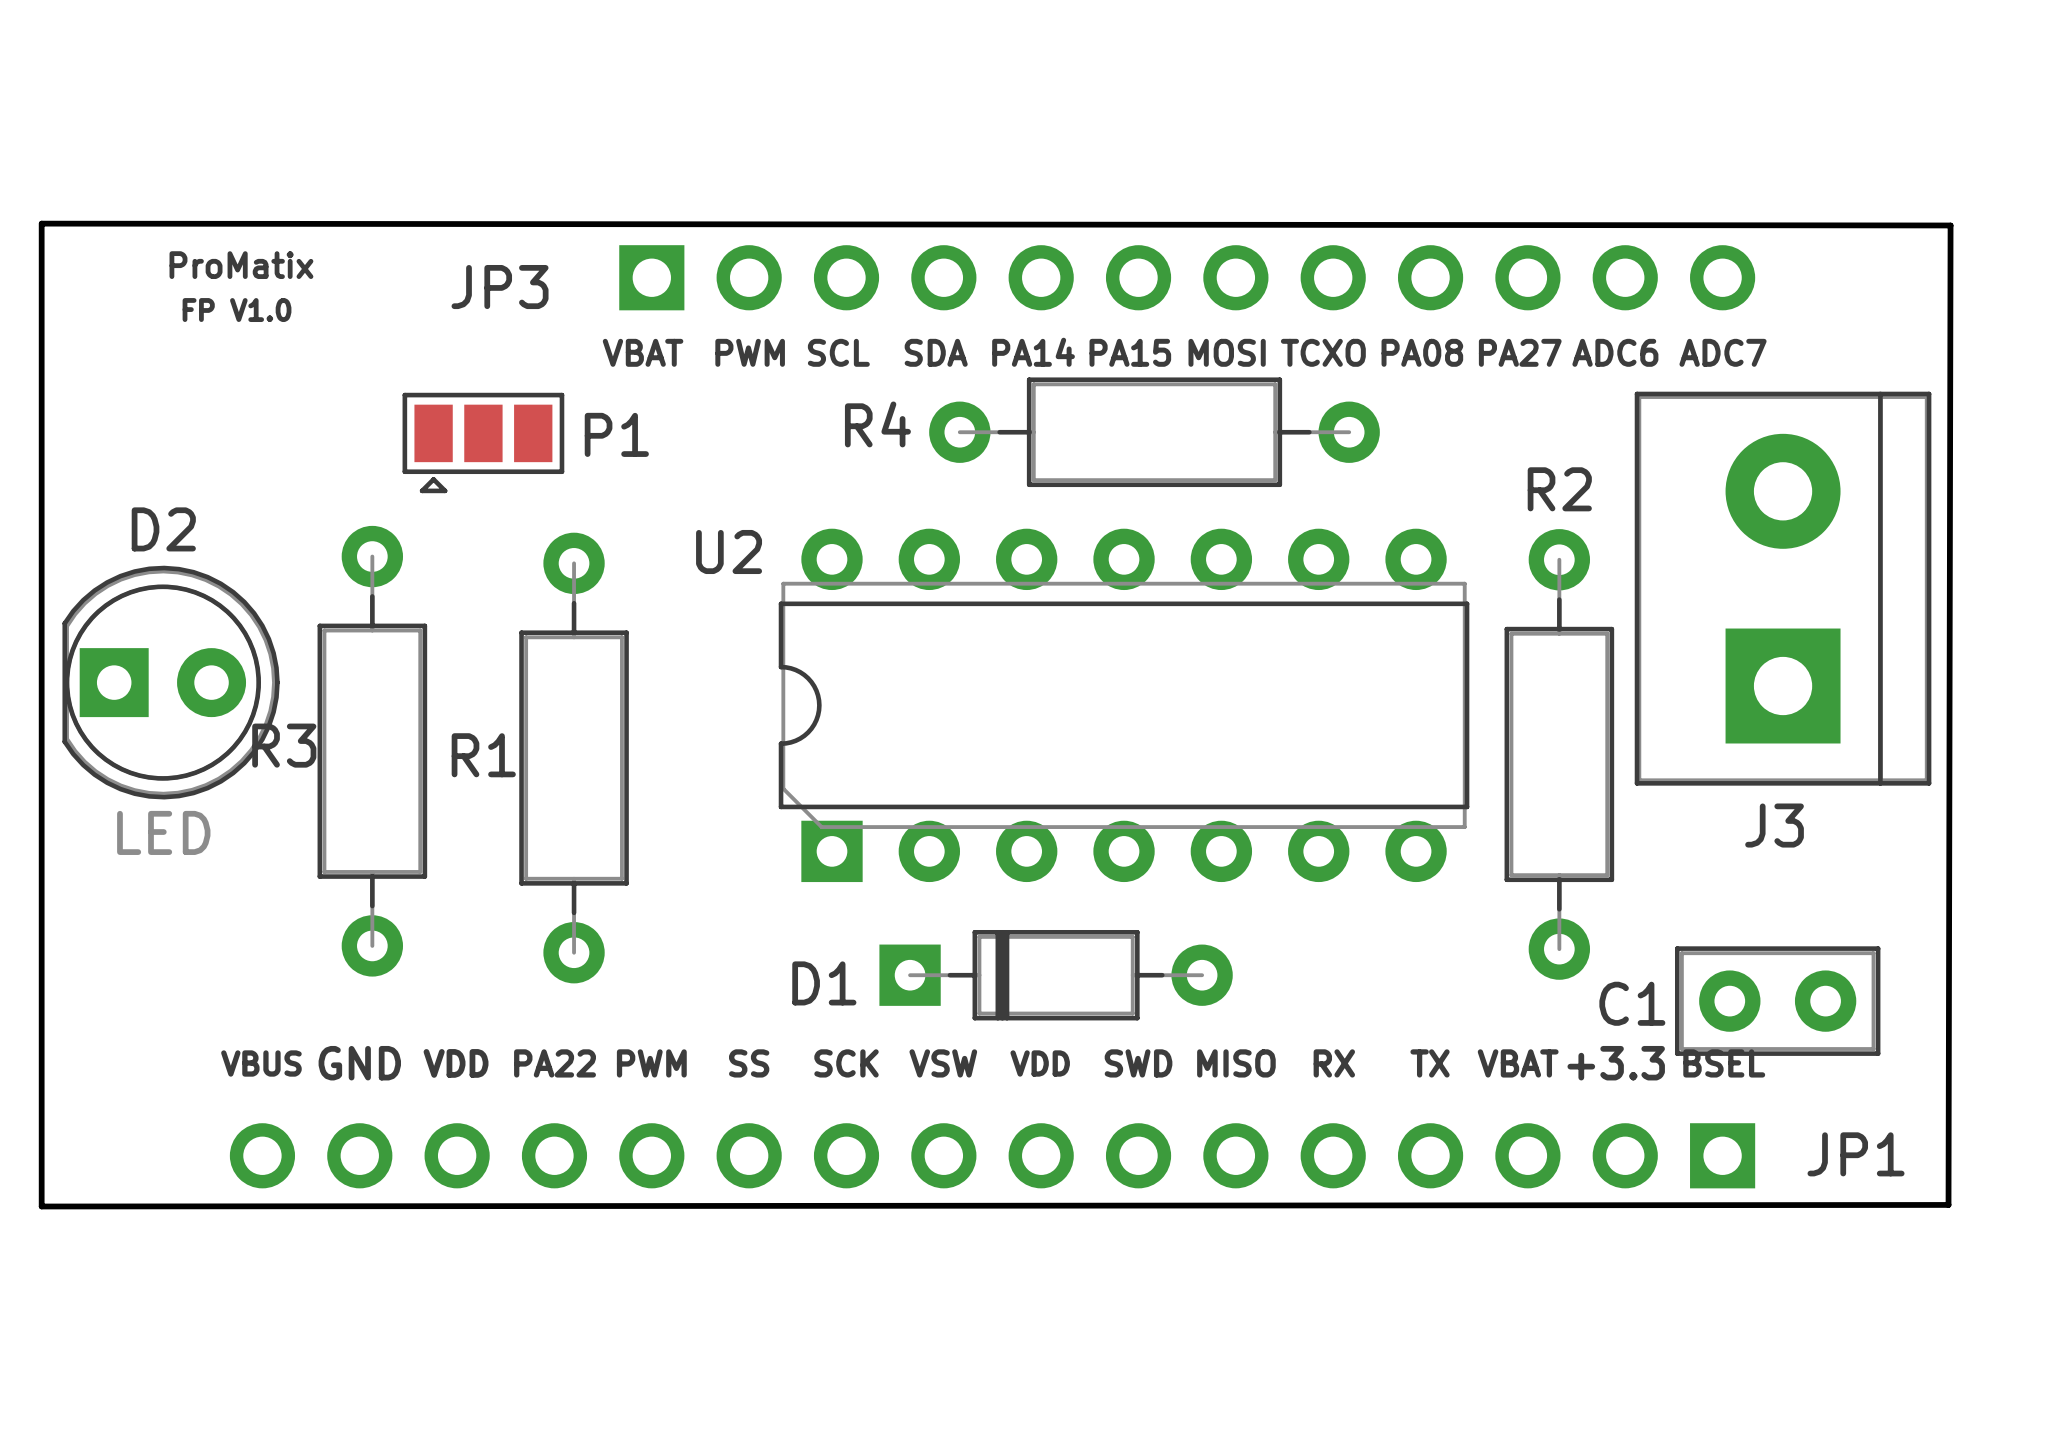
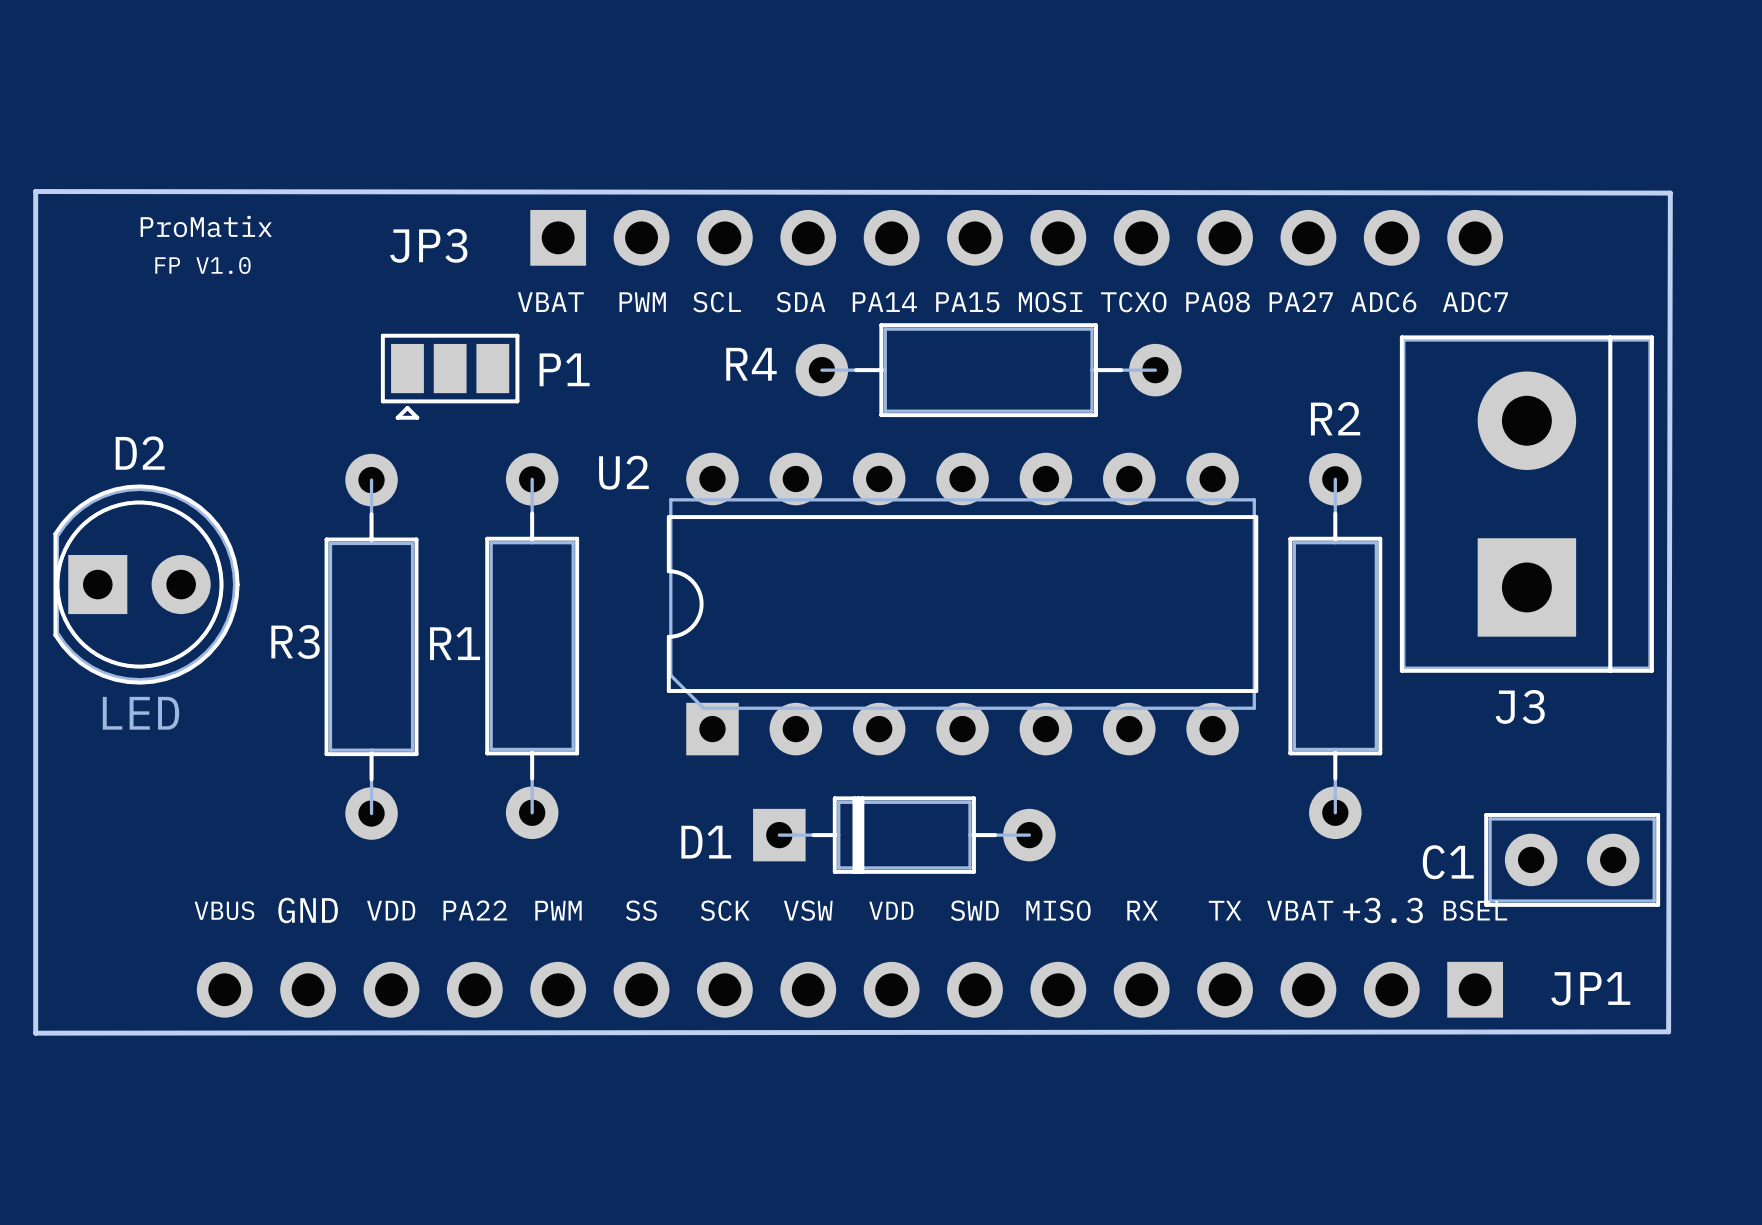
P1 position: (483, 442) -> (450, 376)
R3 position: (372, 751) -> (371, 646)
R1 position: (574, 758) -> (532, 646)
C1 position: (1777, 1001) -> (1572, 859)

